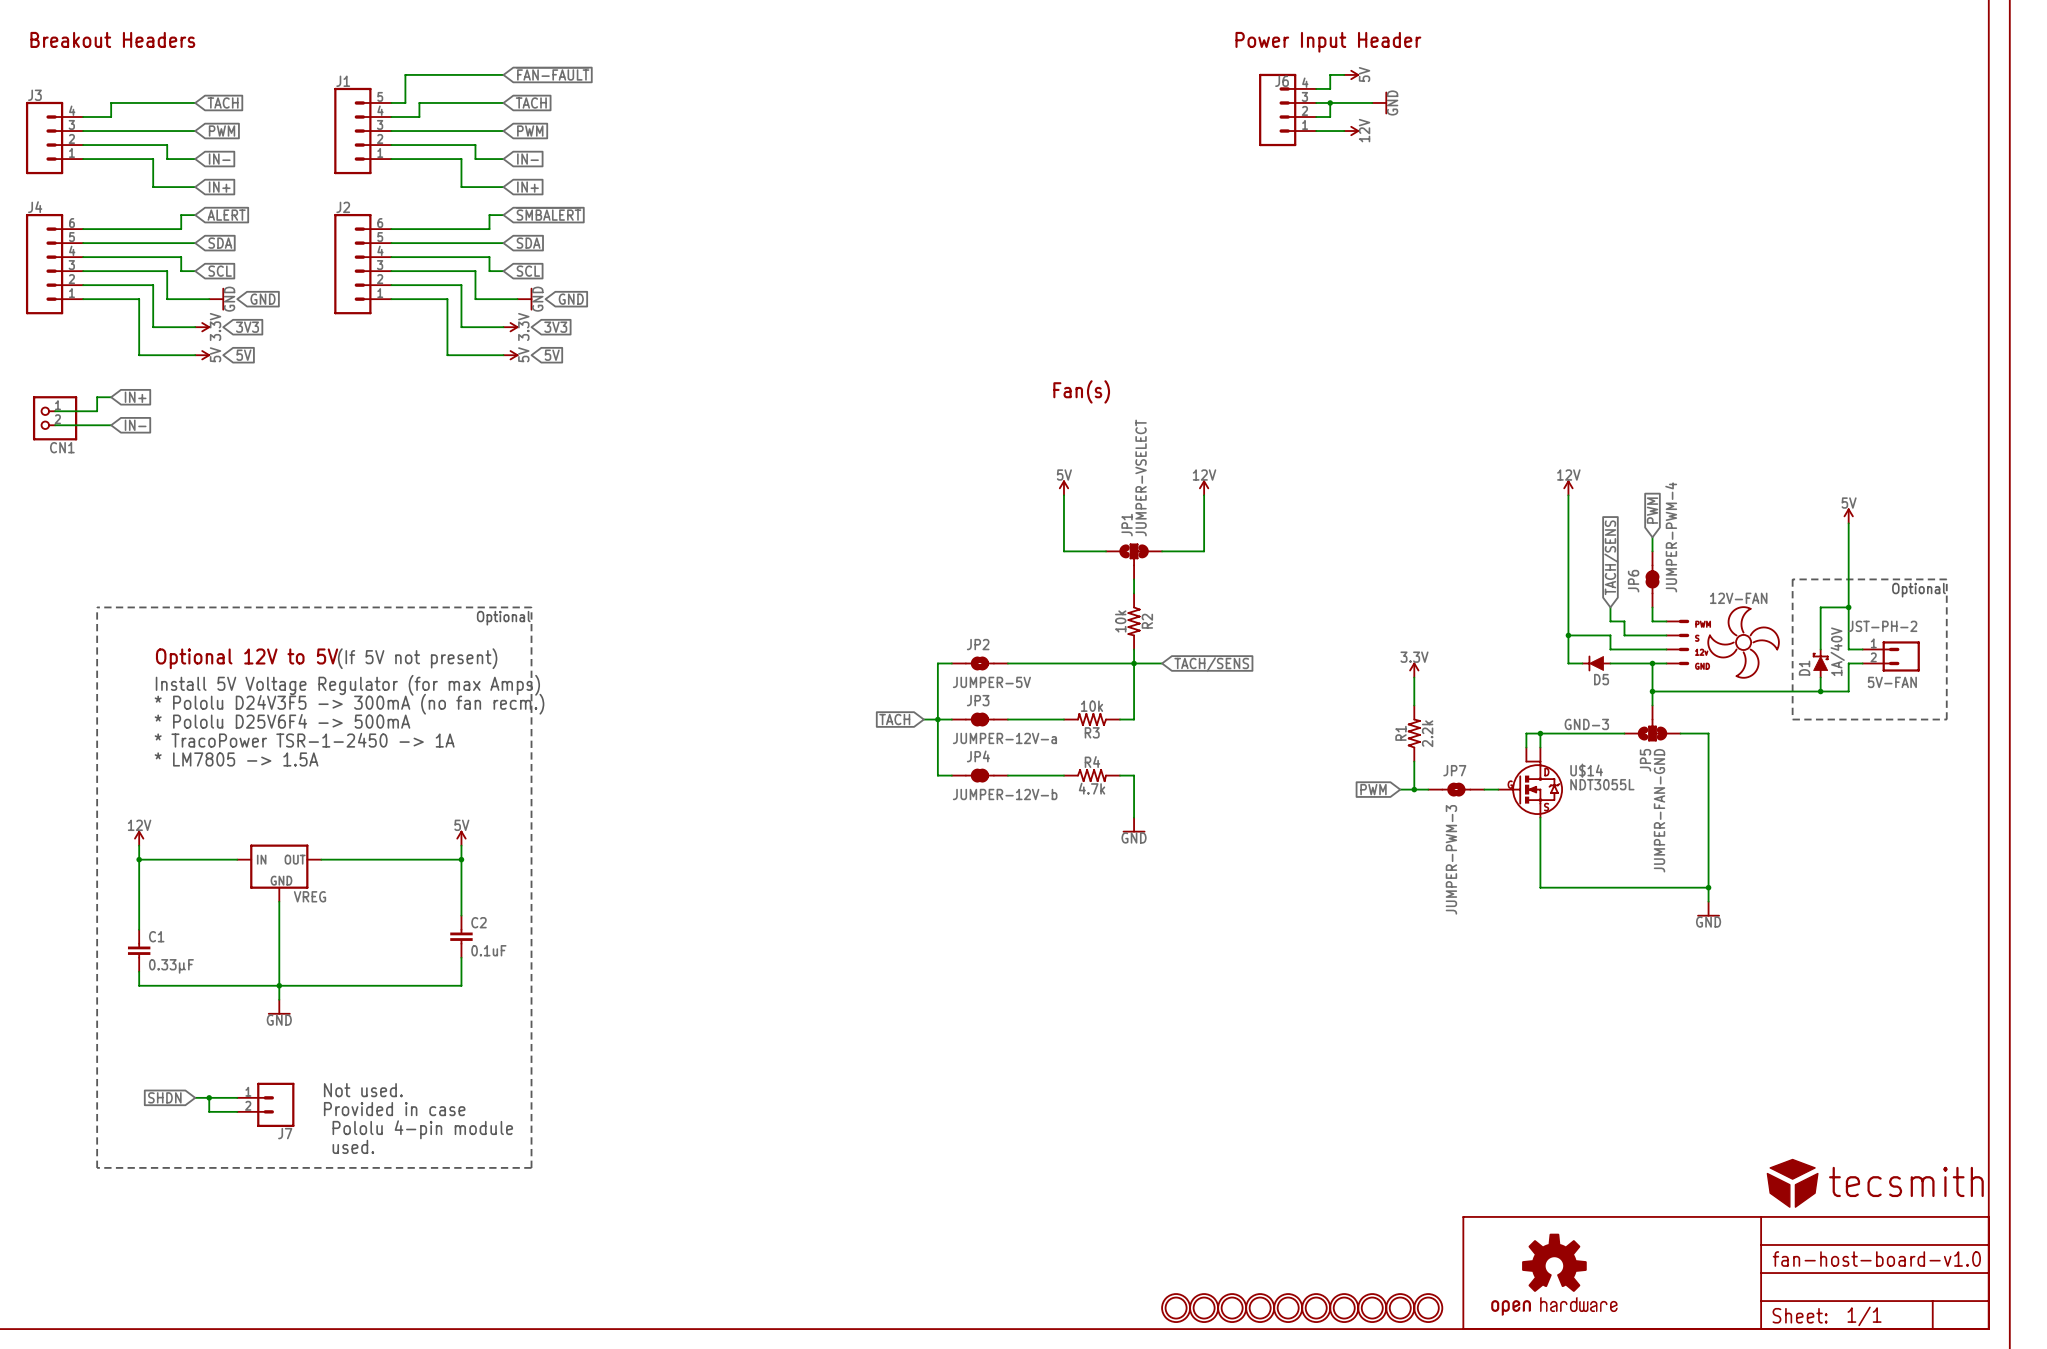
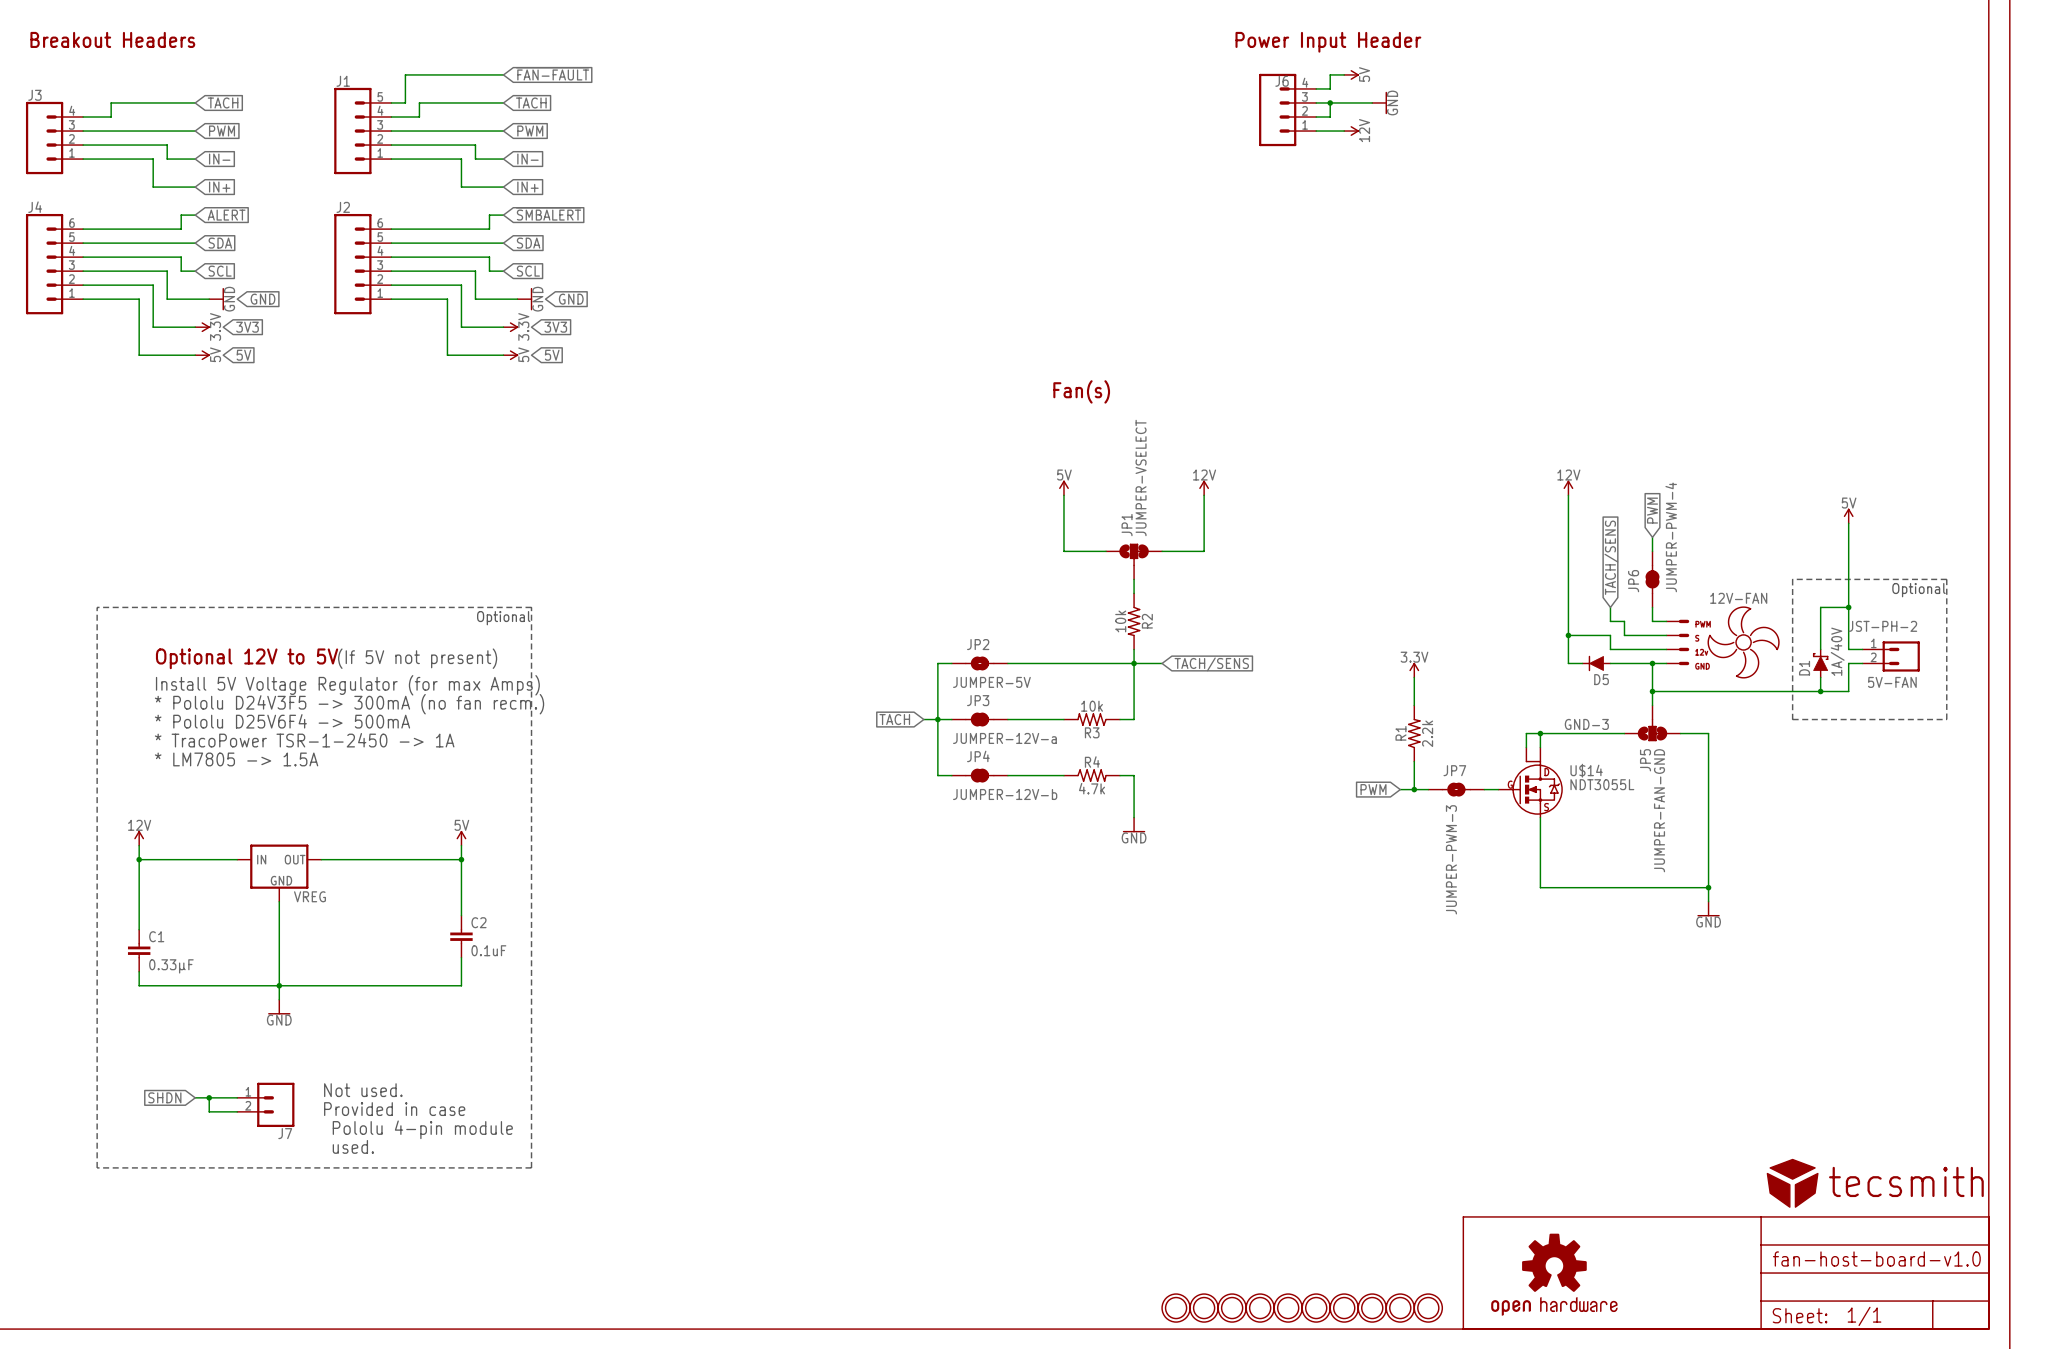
wire: (111, 397) (97, 397) (97, 411) (55, 411) -> none
global label: IN+ (135, 397) -> none
CN1: (55, 418) -> none
wire: (55, 425) (111, 425) -> none
global label: IN- (135, 425) -> none

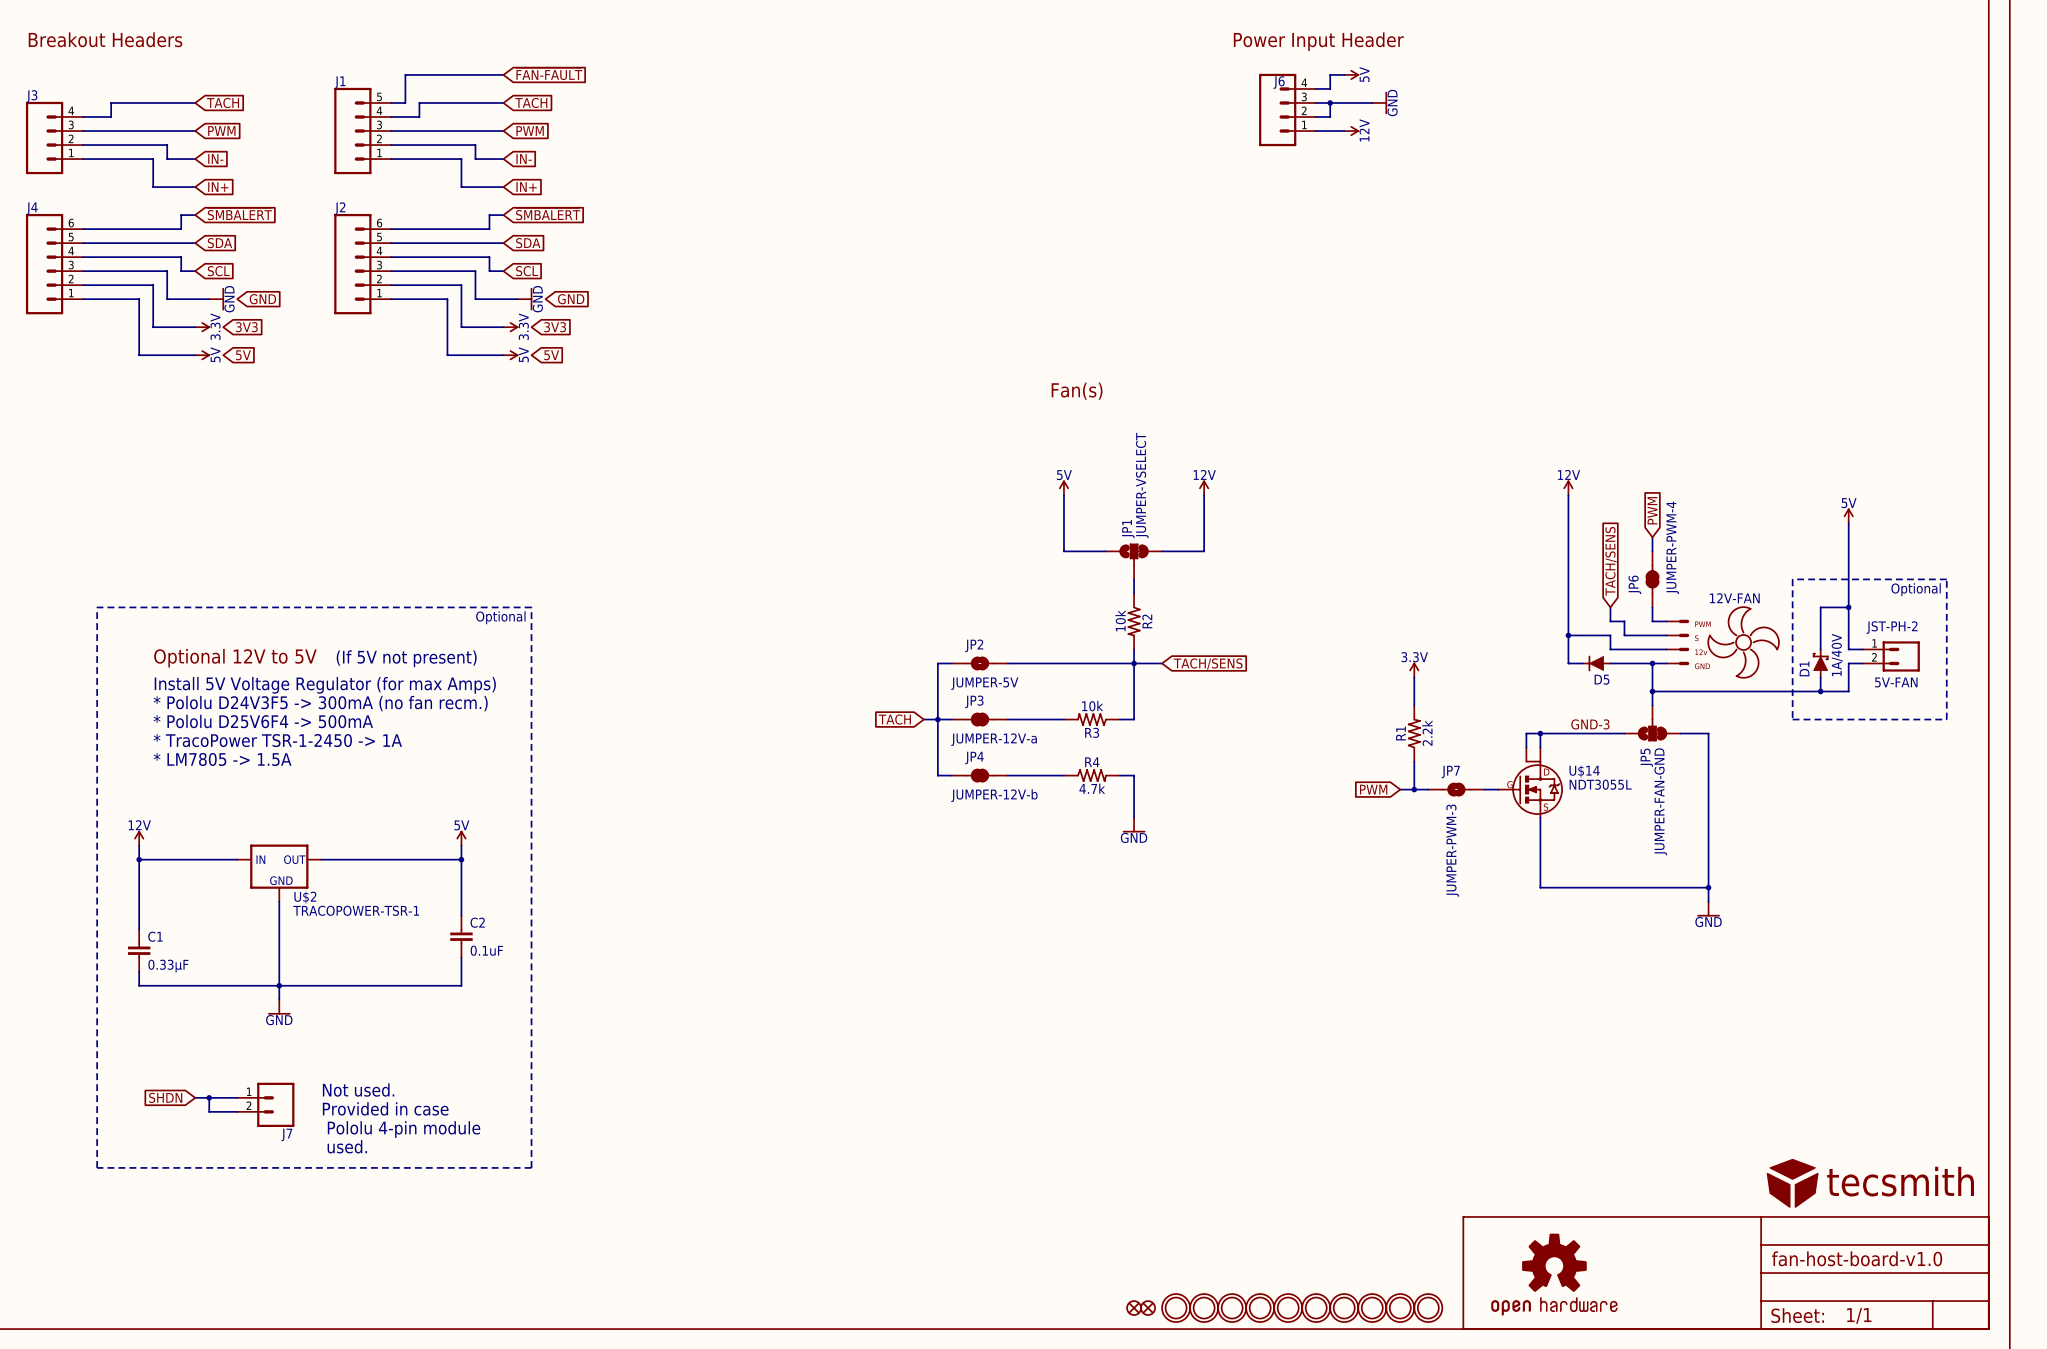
global label: ALERT (226, 215) -> ~{SMBALERT} (239, 214)
VREG name: VREG (310, 896) -> U$2 (305, 897)
VREG value: none -> TRACOPOWER-TSR-1 (356, 910)
part: none -> (1134, 1308)
part: none -> (1148, 1308)

